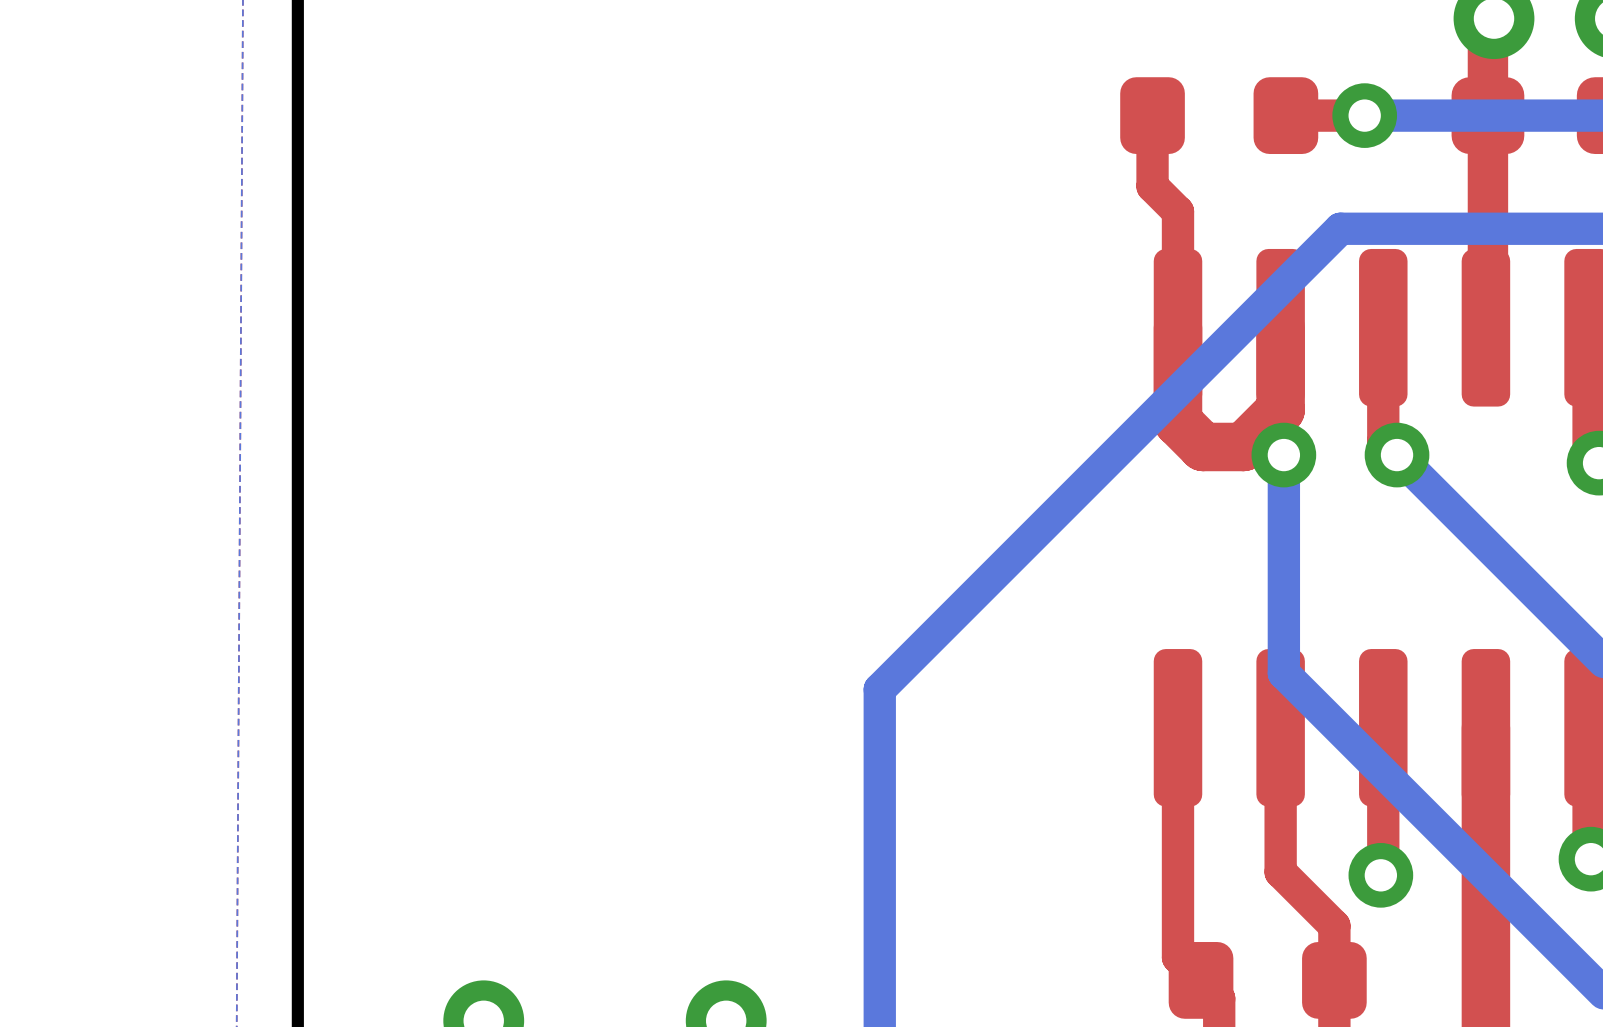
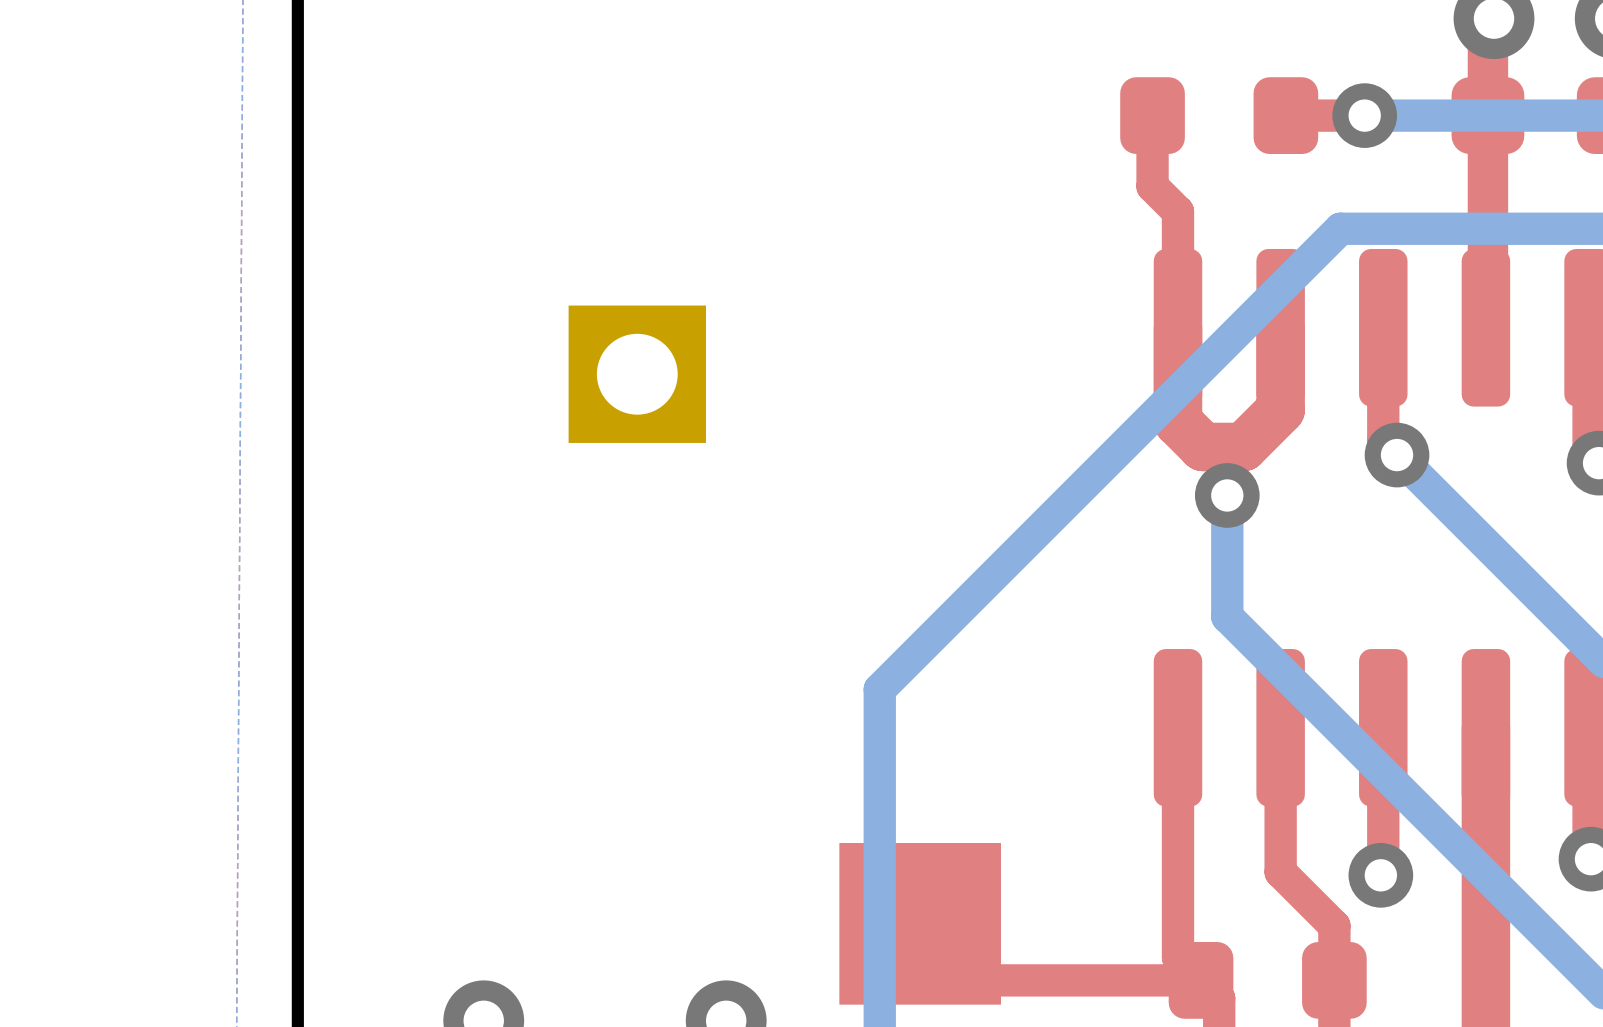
part: none -> (637, 374)
bottom track: (1283, 455) (1283, 673) -> (1227, 495) (1227, 616) (1283, 673)
via position: (1283, 455) -> (1227, 495)
top track: none -> (920, 923) (976, 980) (1201, 980)
part: none -> (920, 923)

